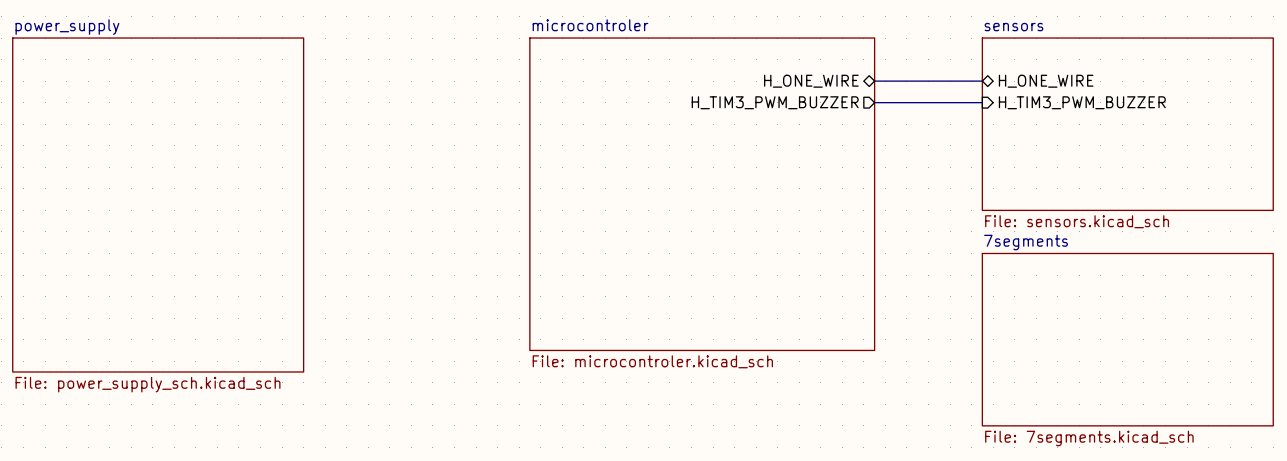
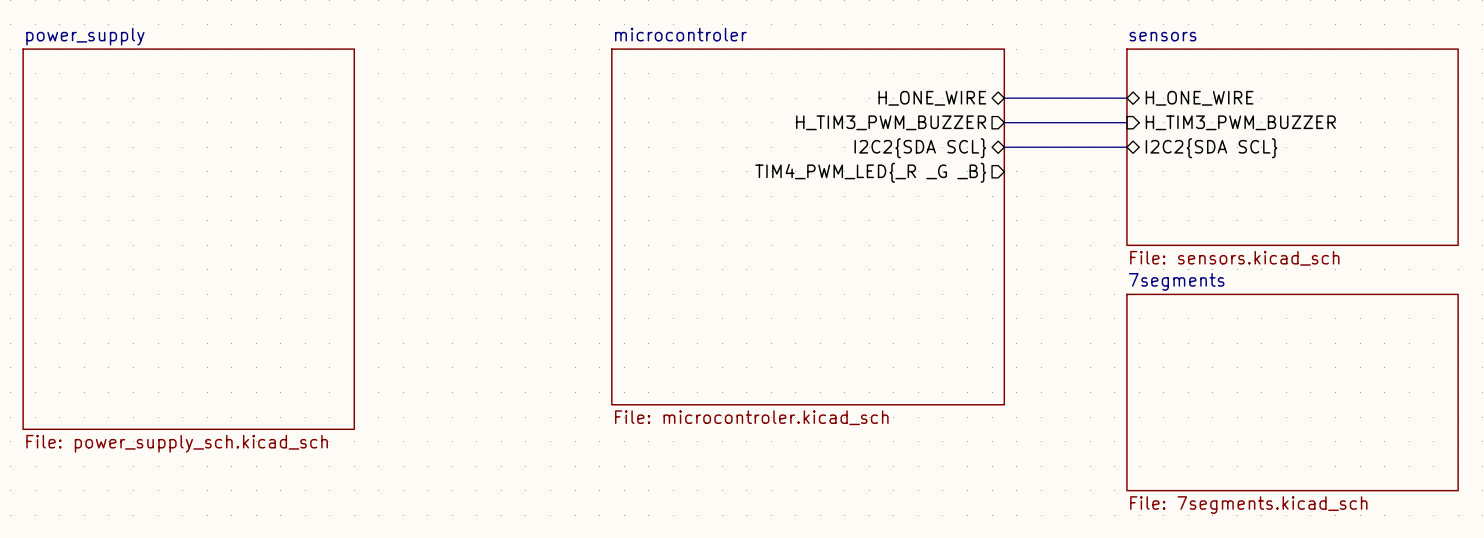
wire: none -> (1004, 147) (1126, 147)
sheet pin: none -> I2C2{SDA SCL} (920, 148)
sheet pin: none -> I2C2{SDA SCL} (1211, 148)
sheet pin: none -> TIM4_PWM_LED{_R _G _B} (870, 172)

